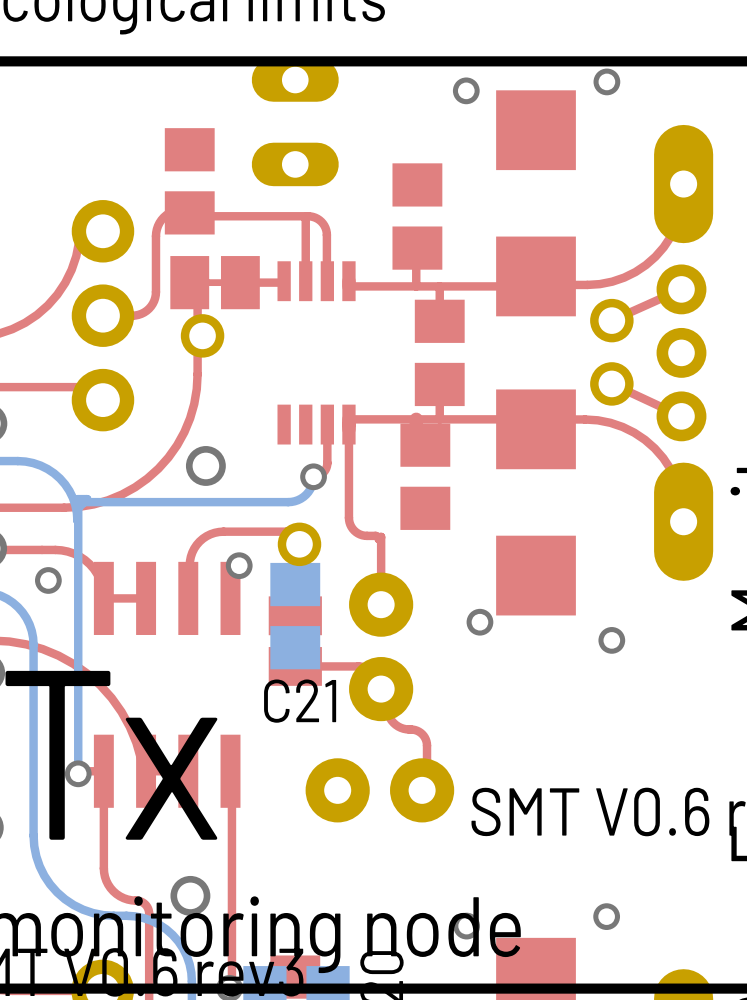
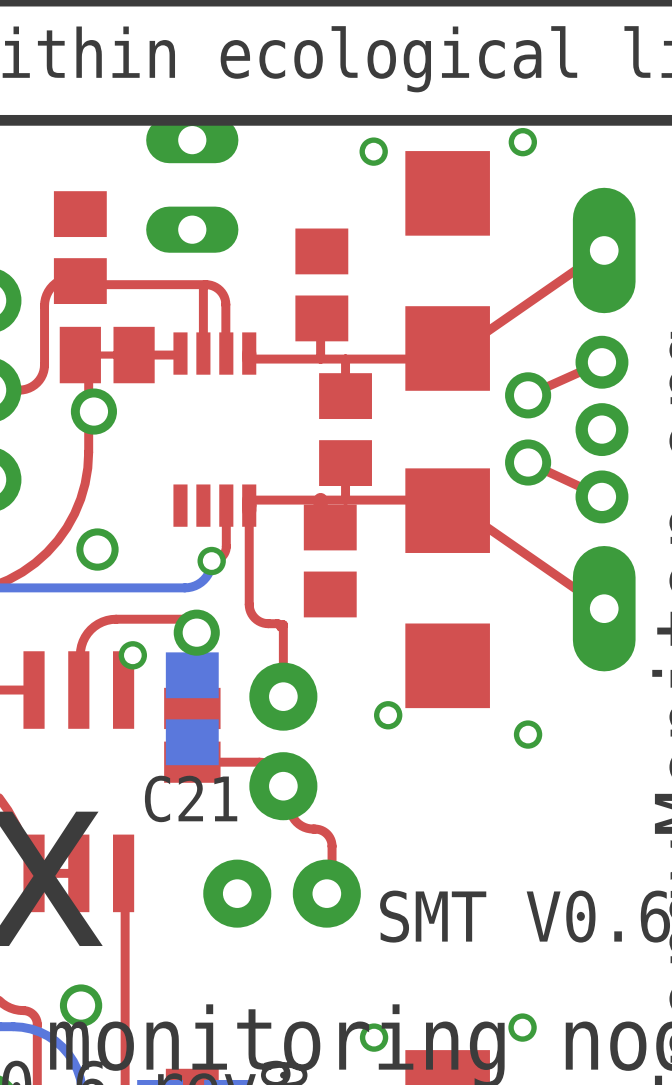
top track: none -> (604, 250) (447, 359)
top track: (683, 188) (680, 213) (670, 236) (655, 256) (635, 272) (624, 277) (599, 284) (520, 284) -> none
top track: (536, 419) (597, 420) (622, 426) (645, 439) (663, 458) (676, 480) (680, 492) (683, 518) -> (447, 500) (604, 608)

